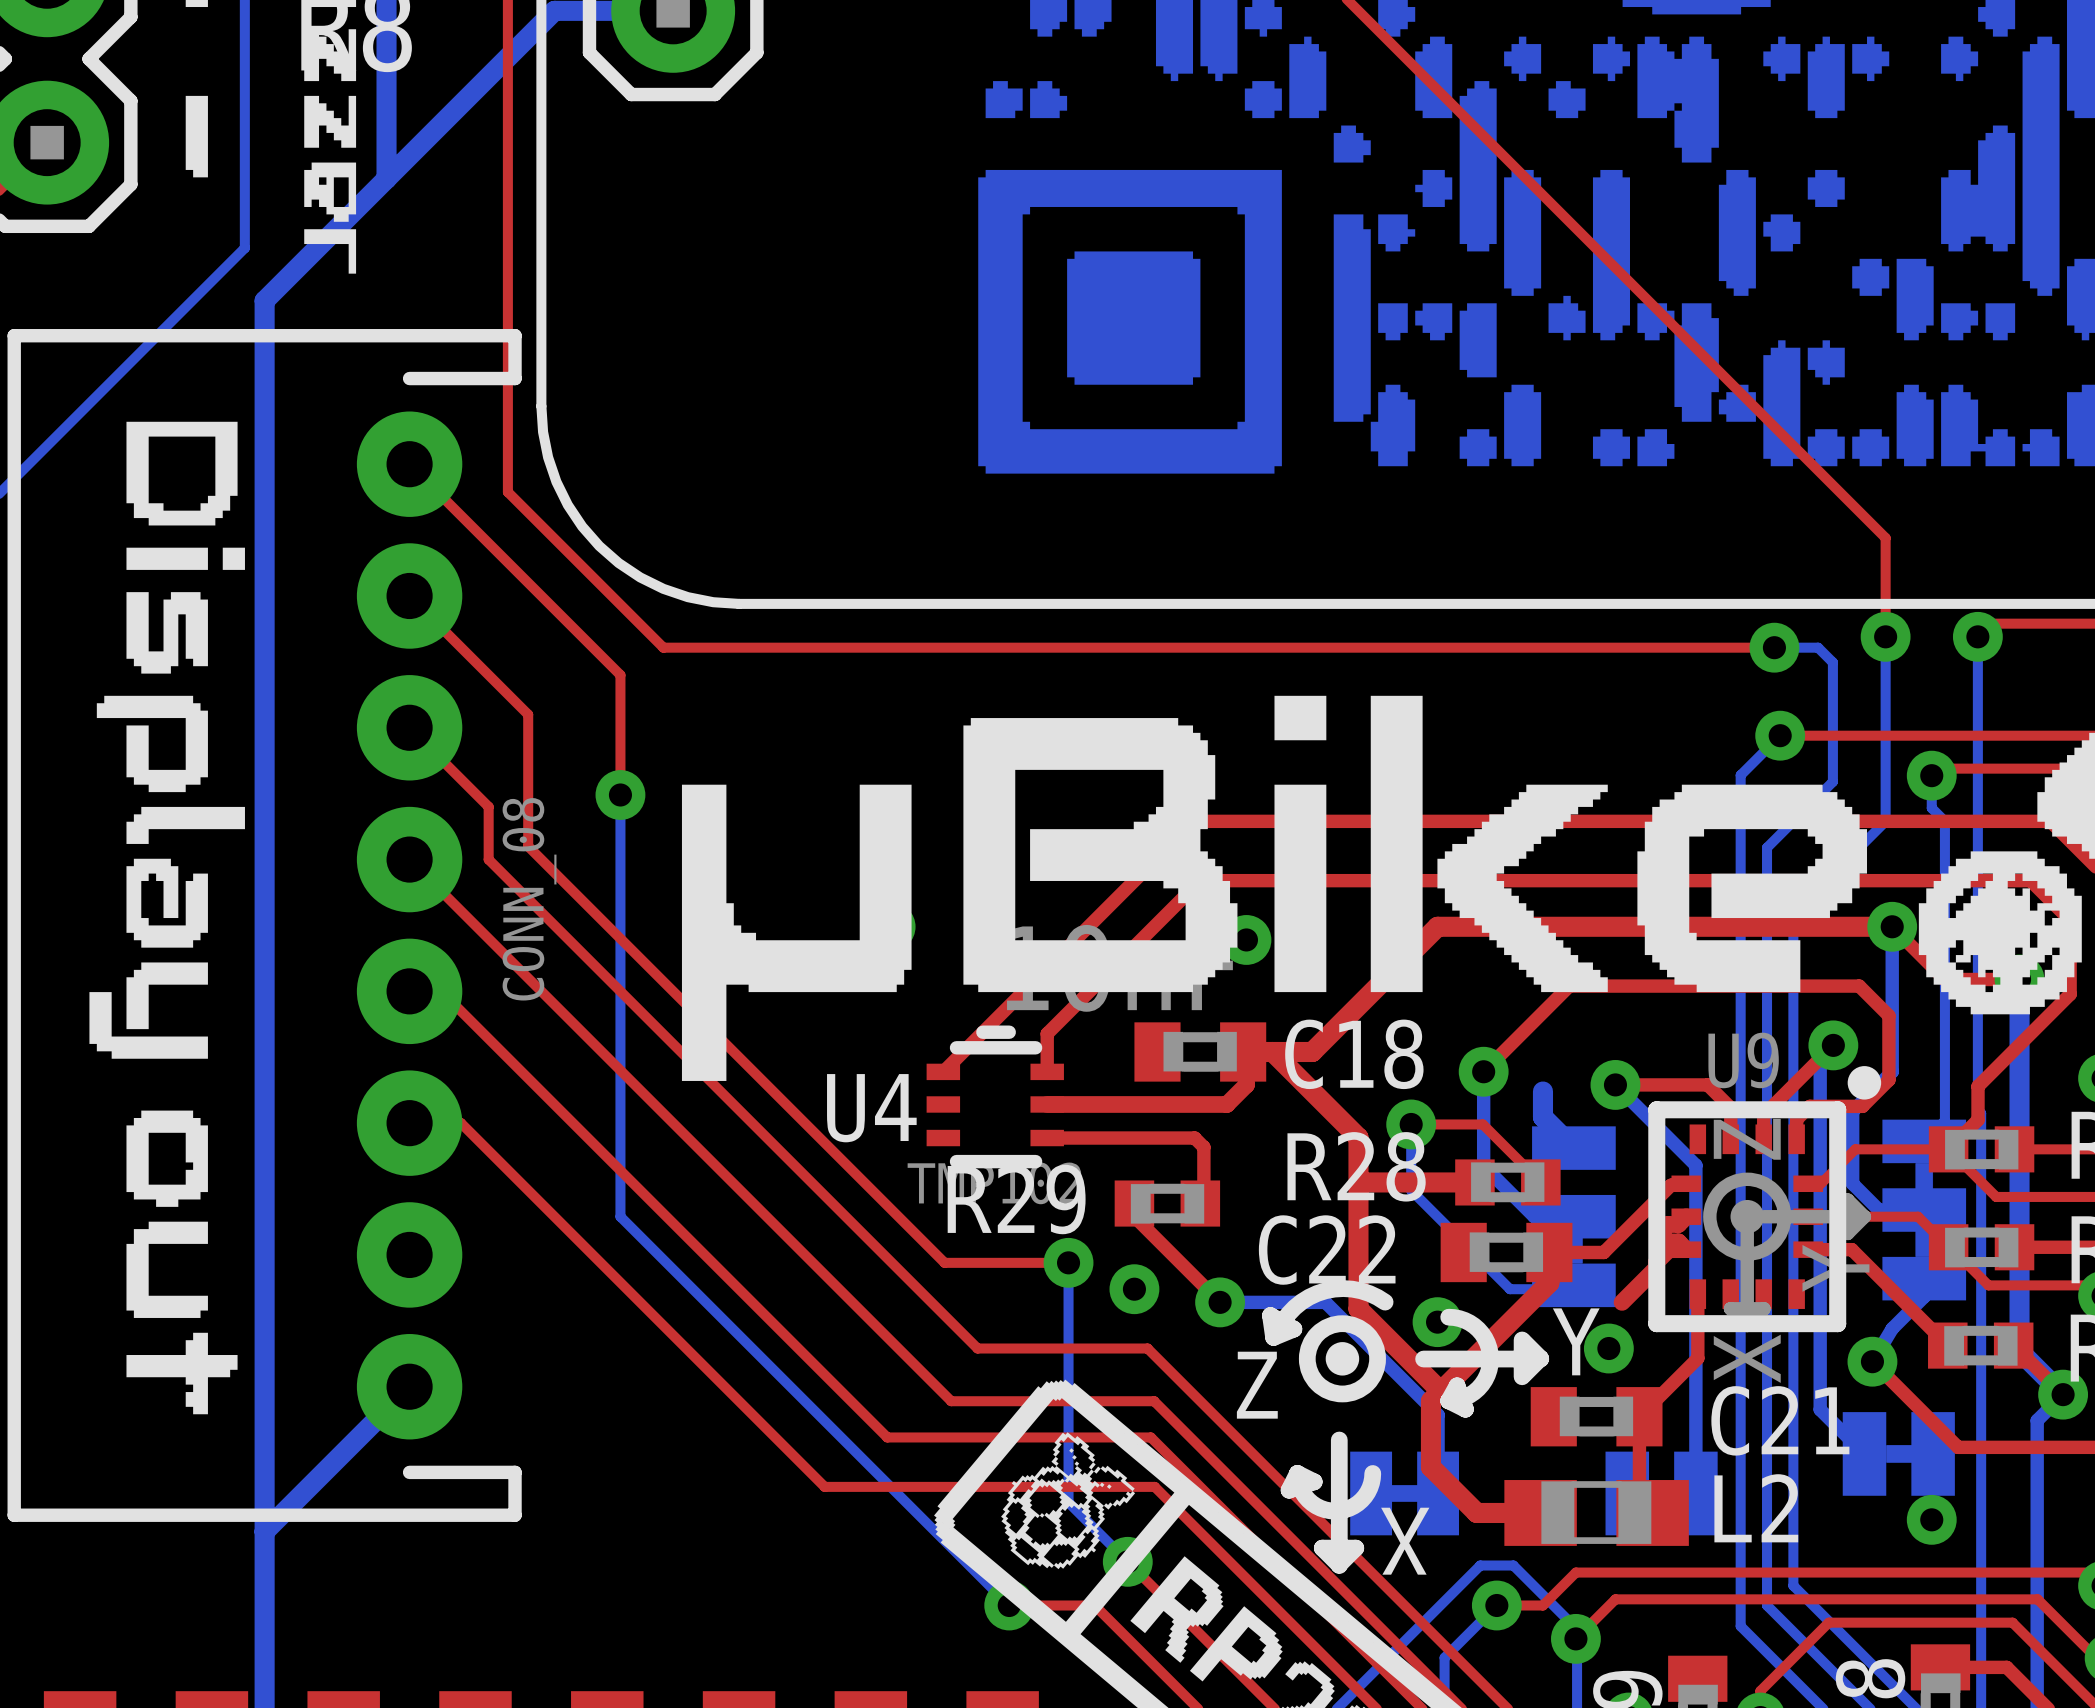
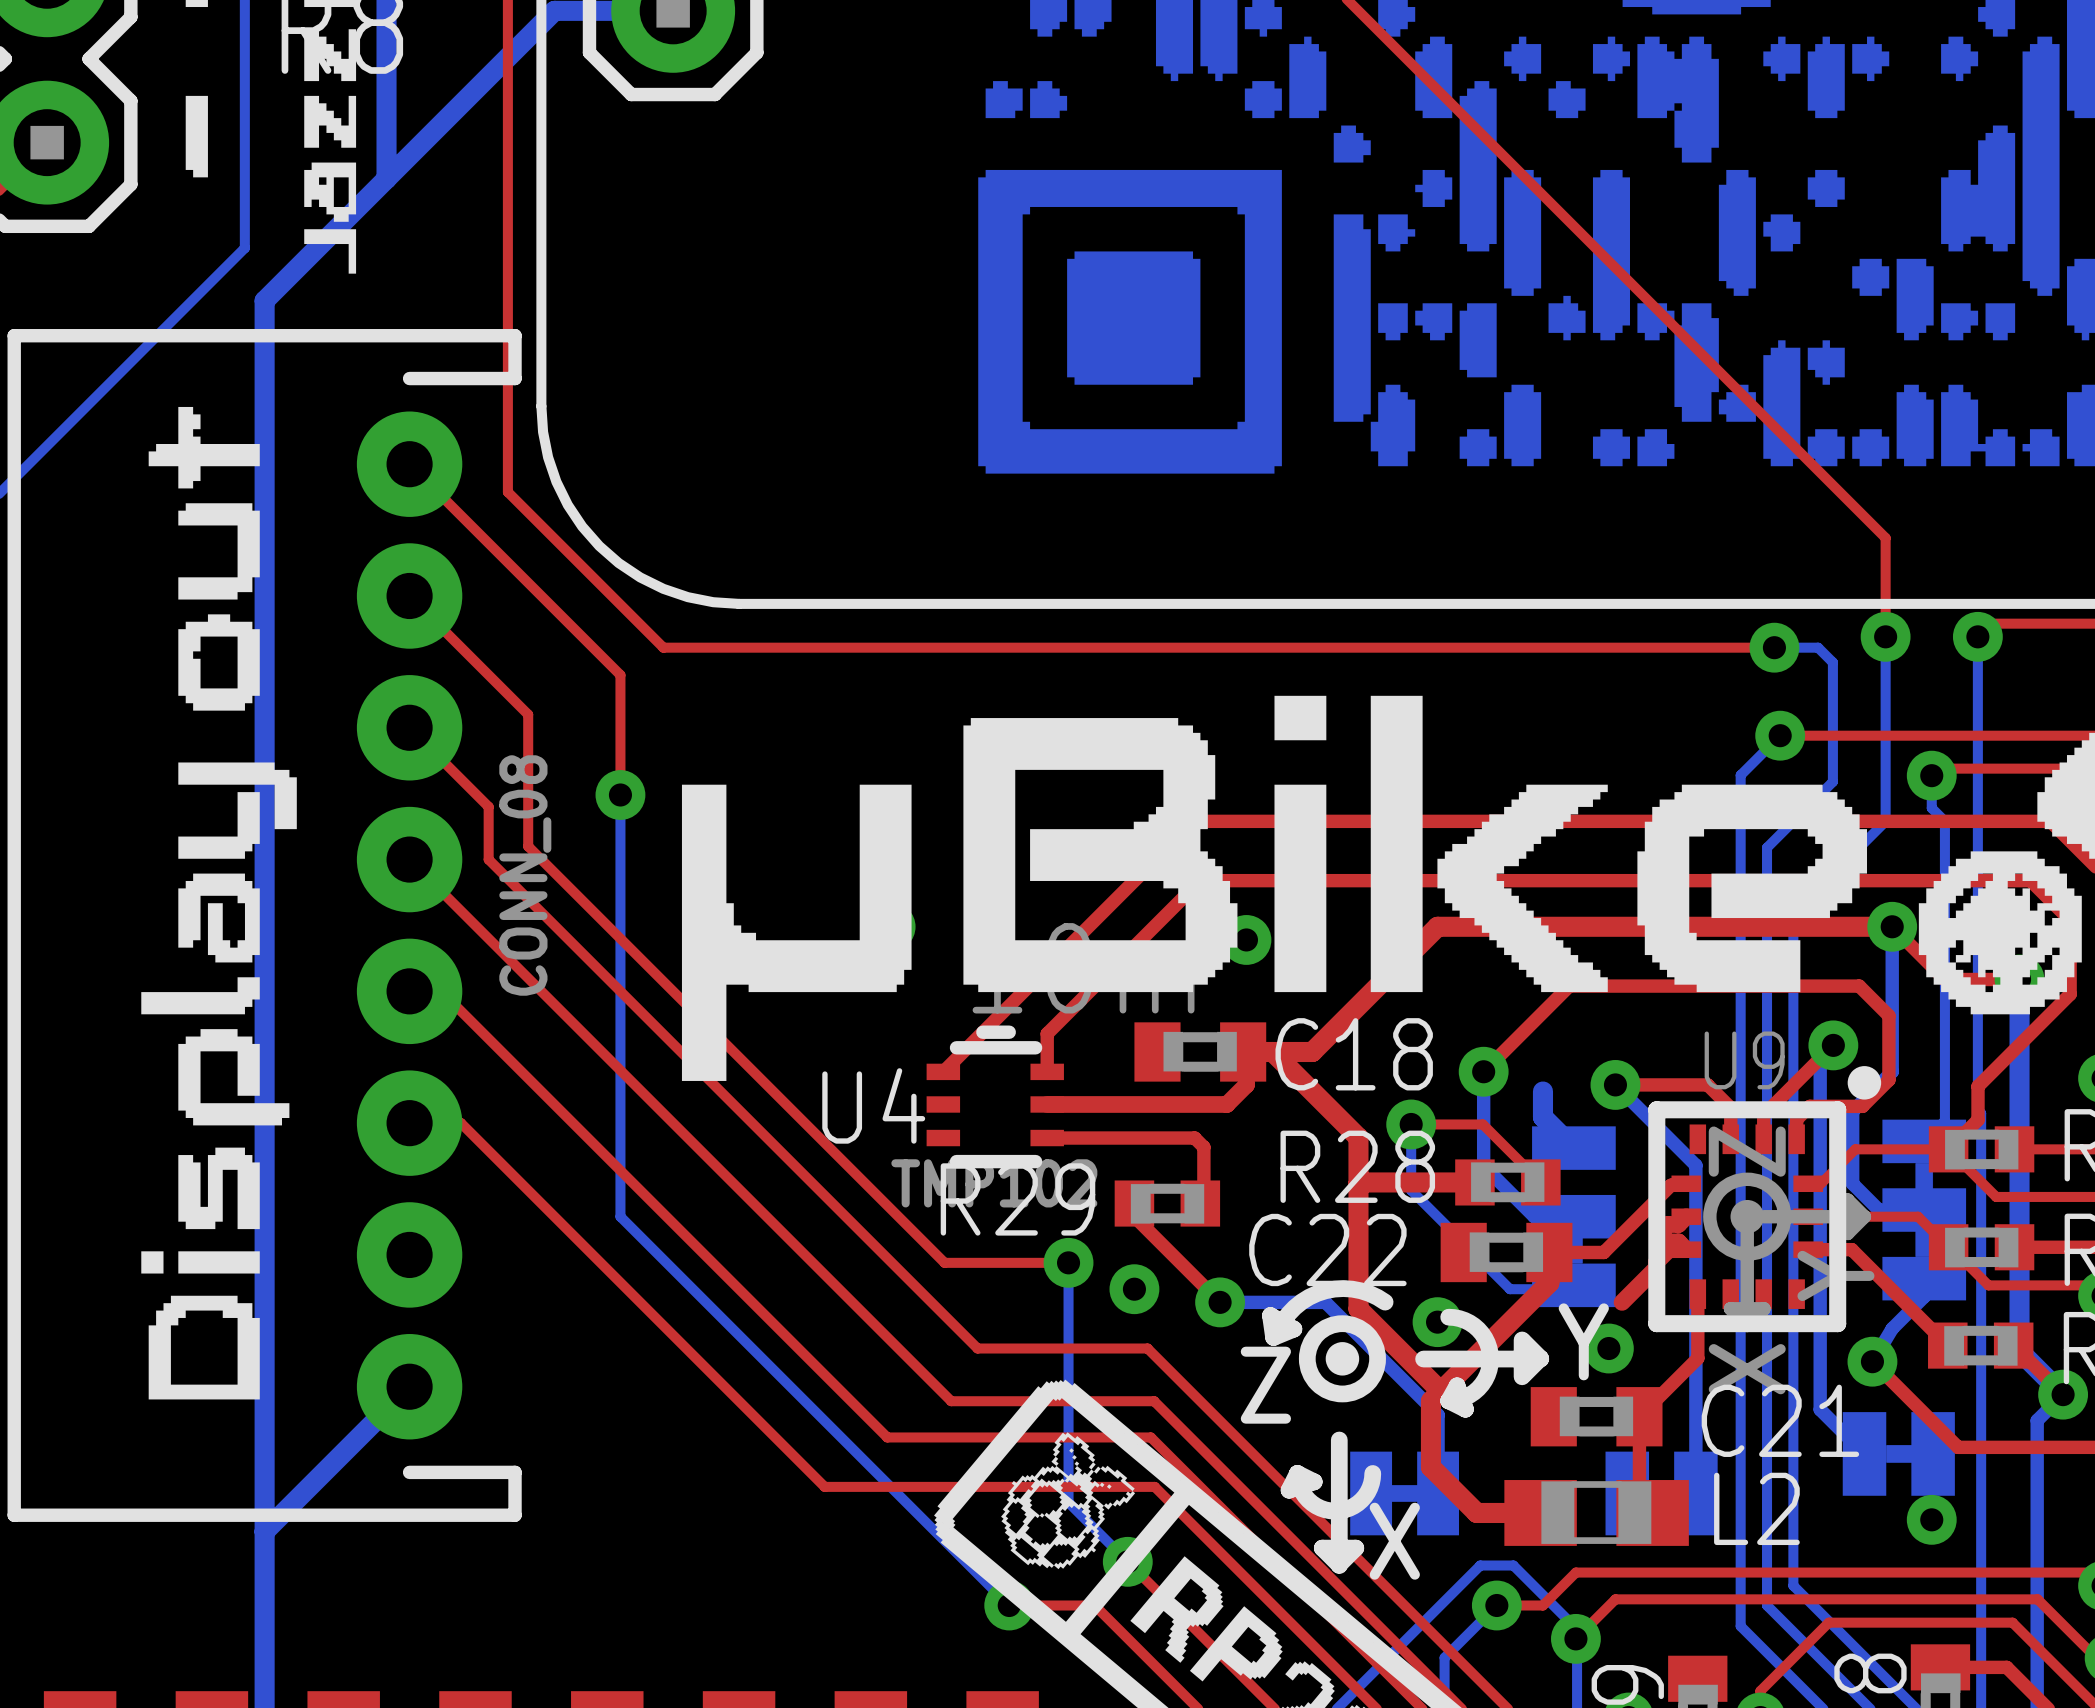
drawing: none -> [141, 406, 297, 1400]
drawing: [89, 421, 245, 1415] -> none
drawing shape: [200, 503, 231, 511] -> [178, 510, 260, 519]
drawing position: (182, 521) -> (219, 506)
drawing shape: [170, 592, 201, 600] -> [178, 584, 253, 593]
drawing position: (152, 655) -> (219, 706)
drawing position: (185, 825) -> (237, 781)
drawing position: (170, 973) -> (215, 847)
drawing position: (148, 1040) -> (200, 995)
drawing position: (159, 1055) -> (226, 766)
drawing position: (167, 1114) -> (233, 1166)
drawing position: (178, 1225) -> (207, 595)
drawing shape: [133, 1229, 208, 1237] -> [185, 1221, 216, 1230]
drawing shape: [126, 1303, 208, 1311] -> [156, 1310, 186, 1318]
drawing position: (167, 1314) -> (204, 1299)

